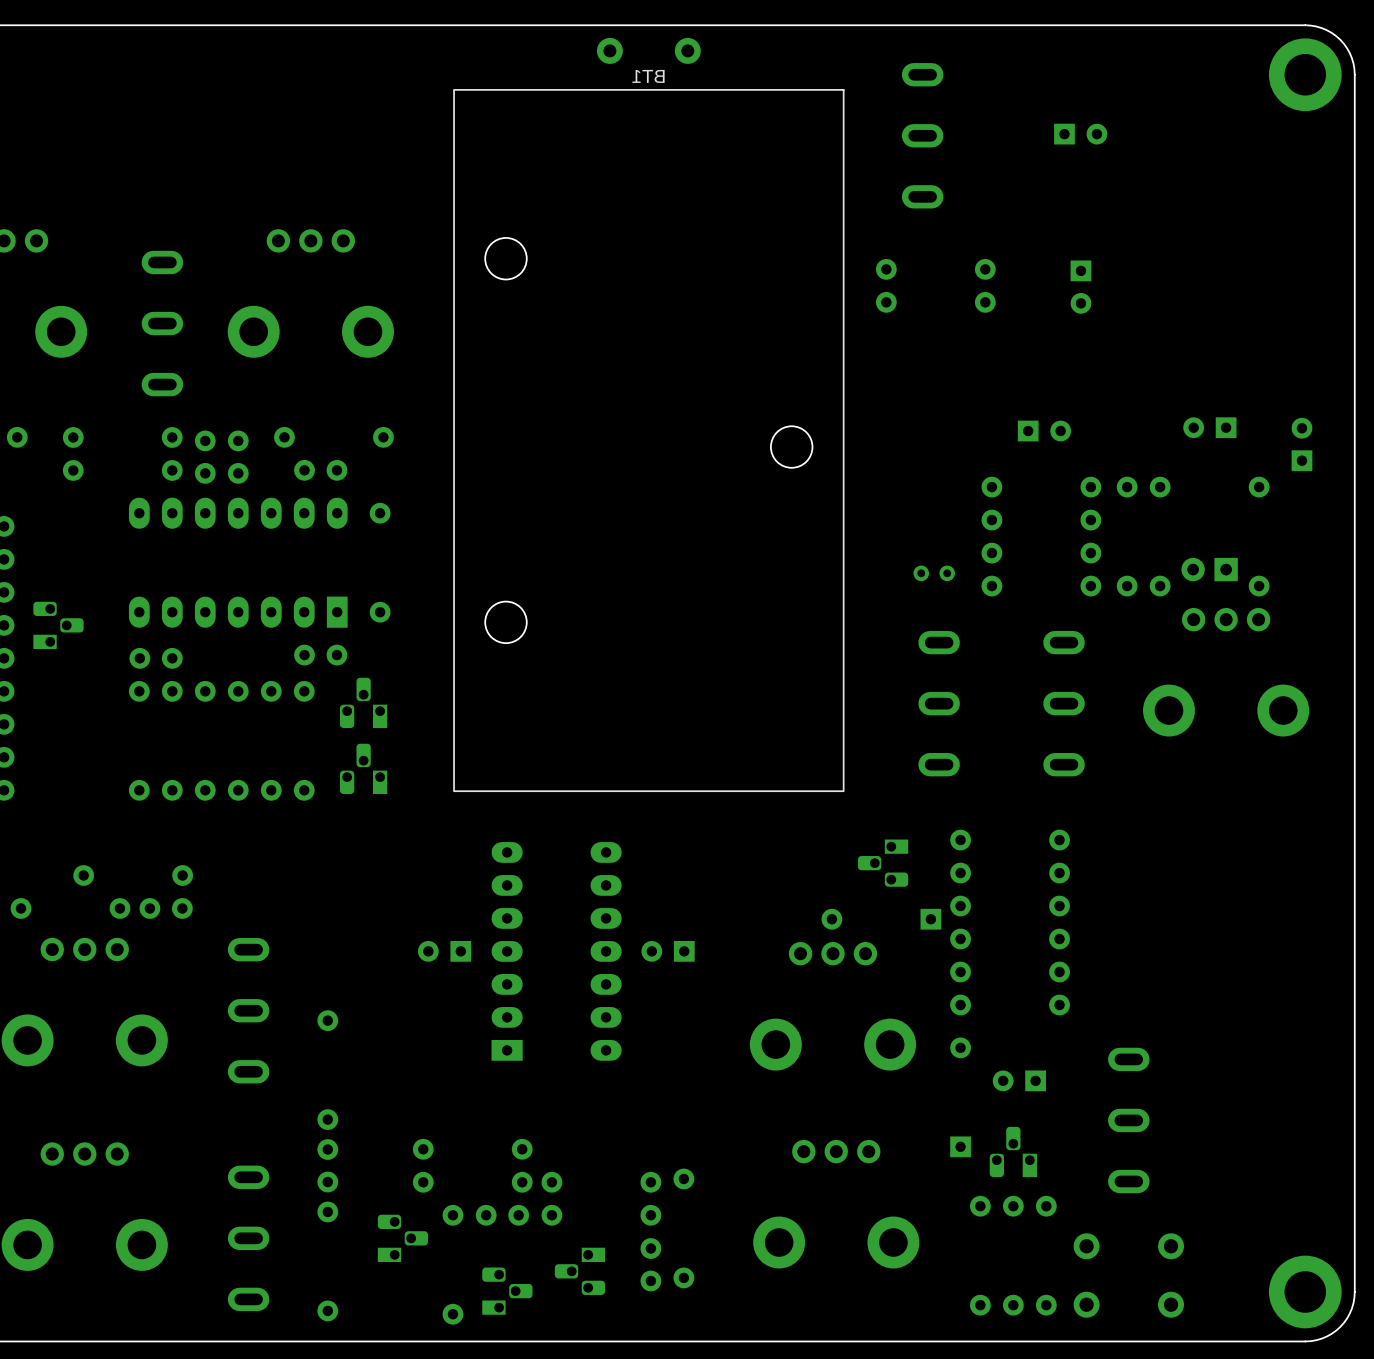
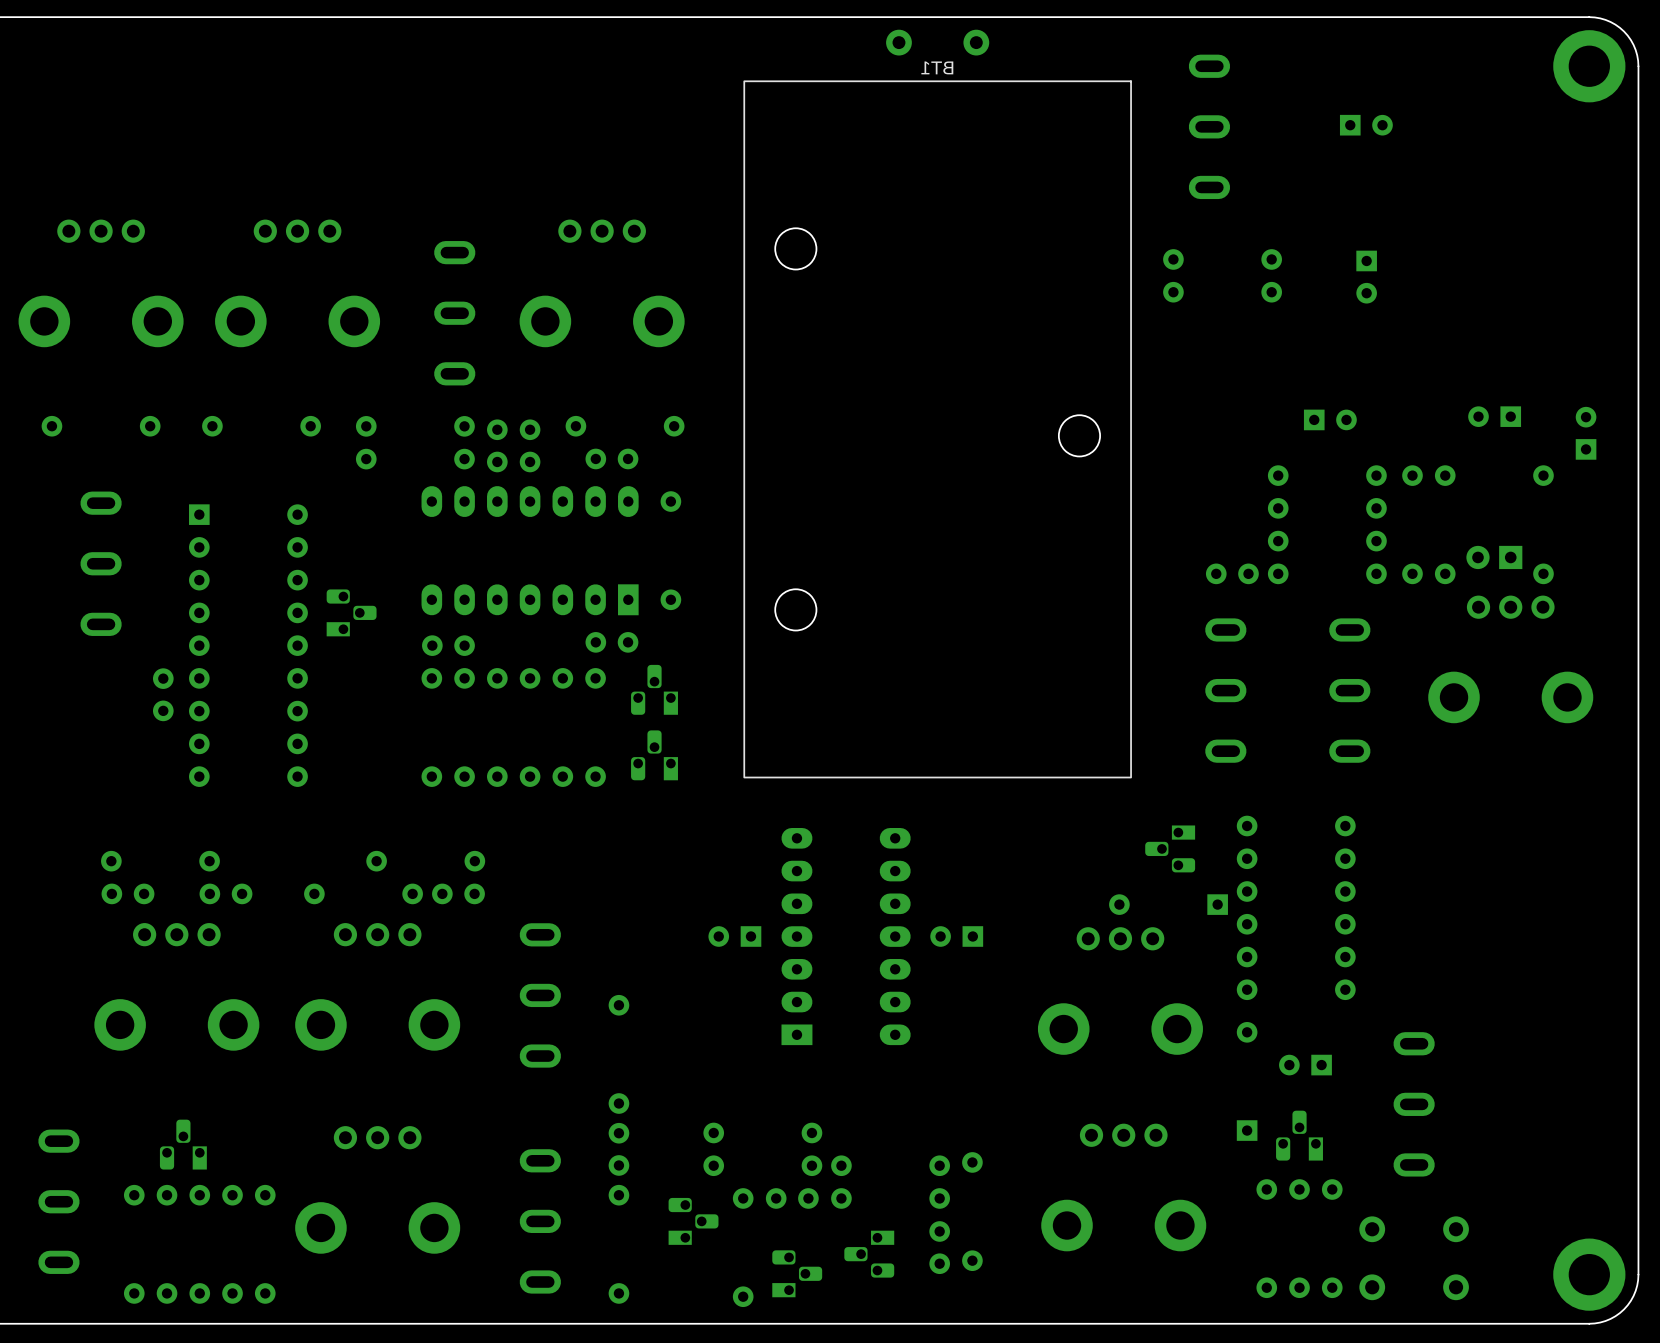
part: (934, 573) -> none
part: none -> (1232, 573)

